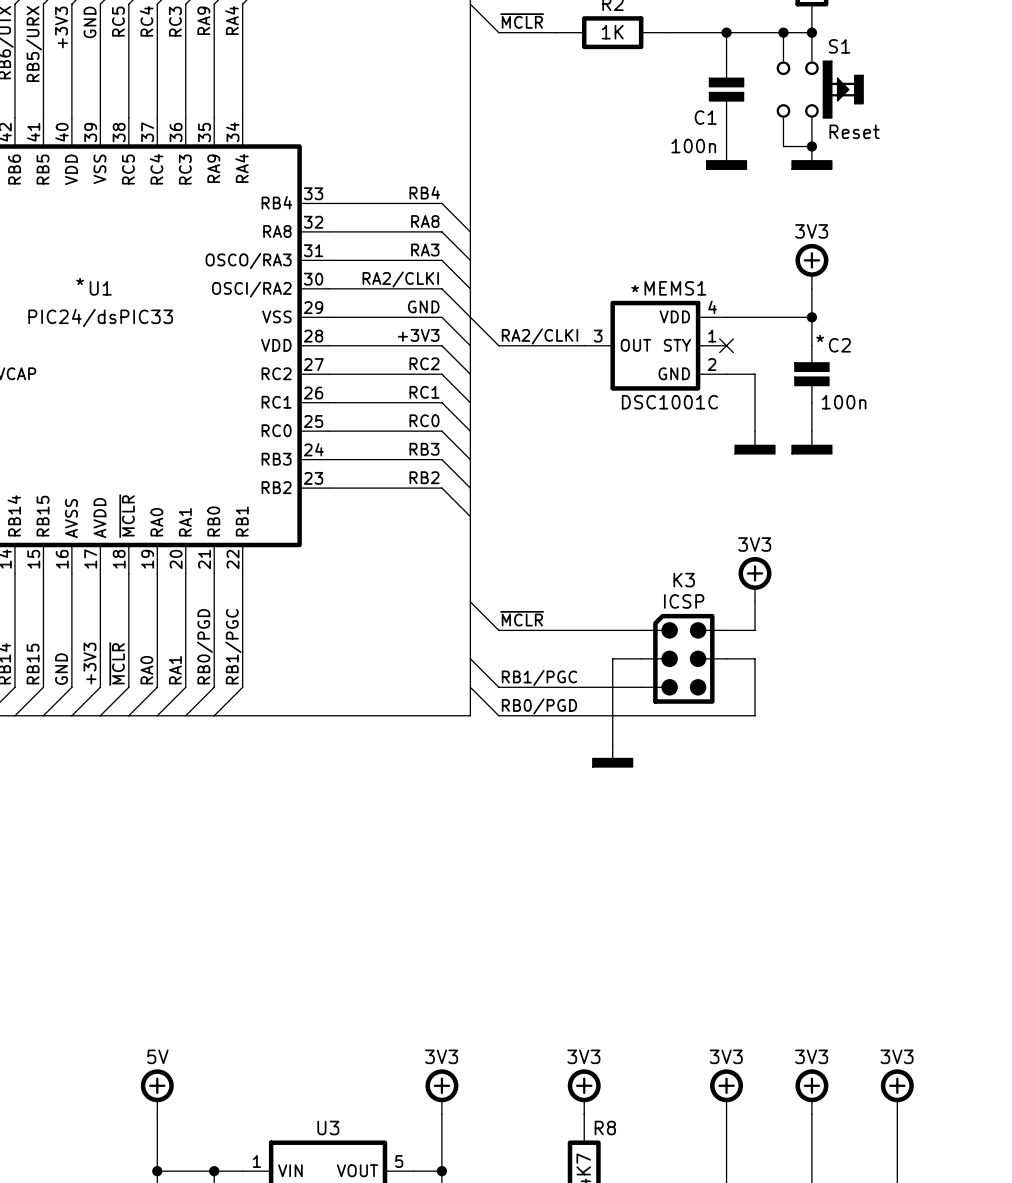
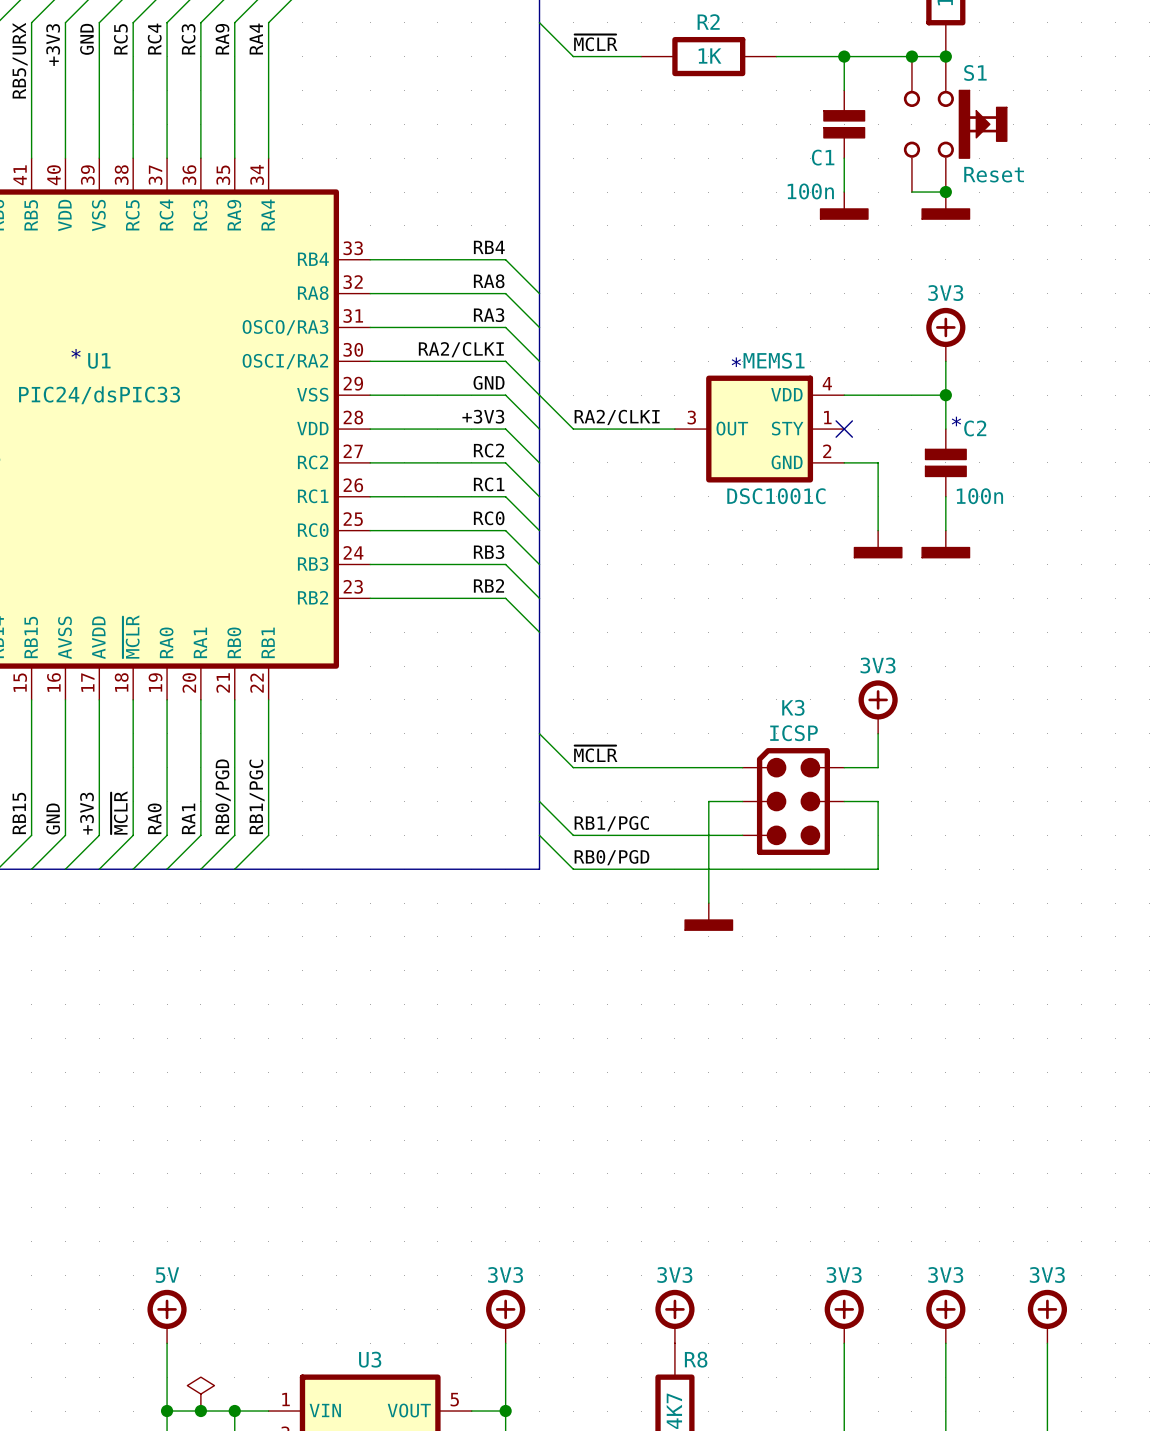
power symbol: none -> (200, 1394)
junction: none -> (200, 1411)

